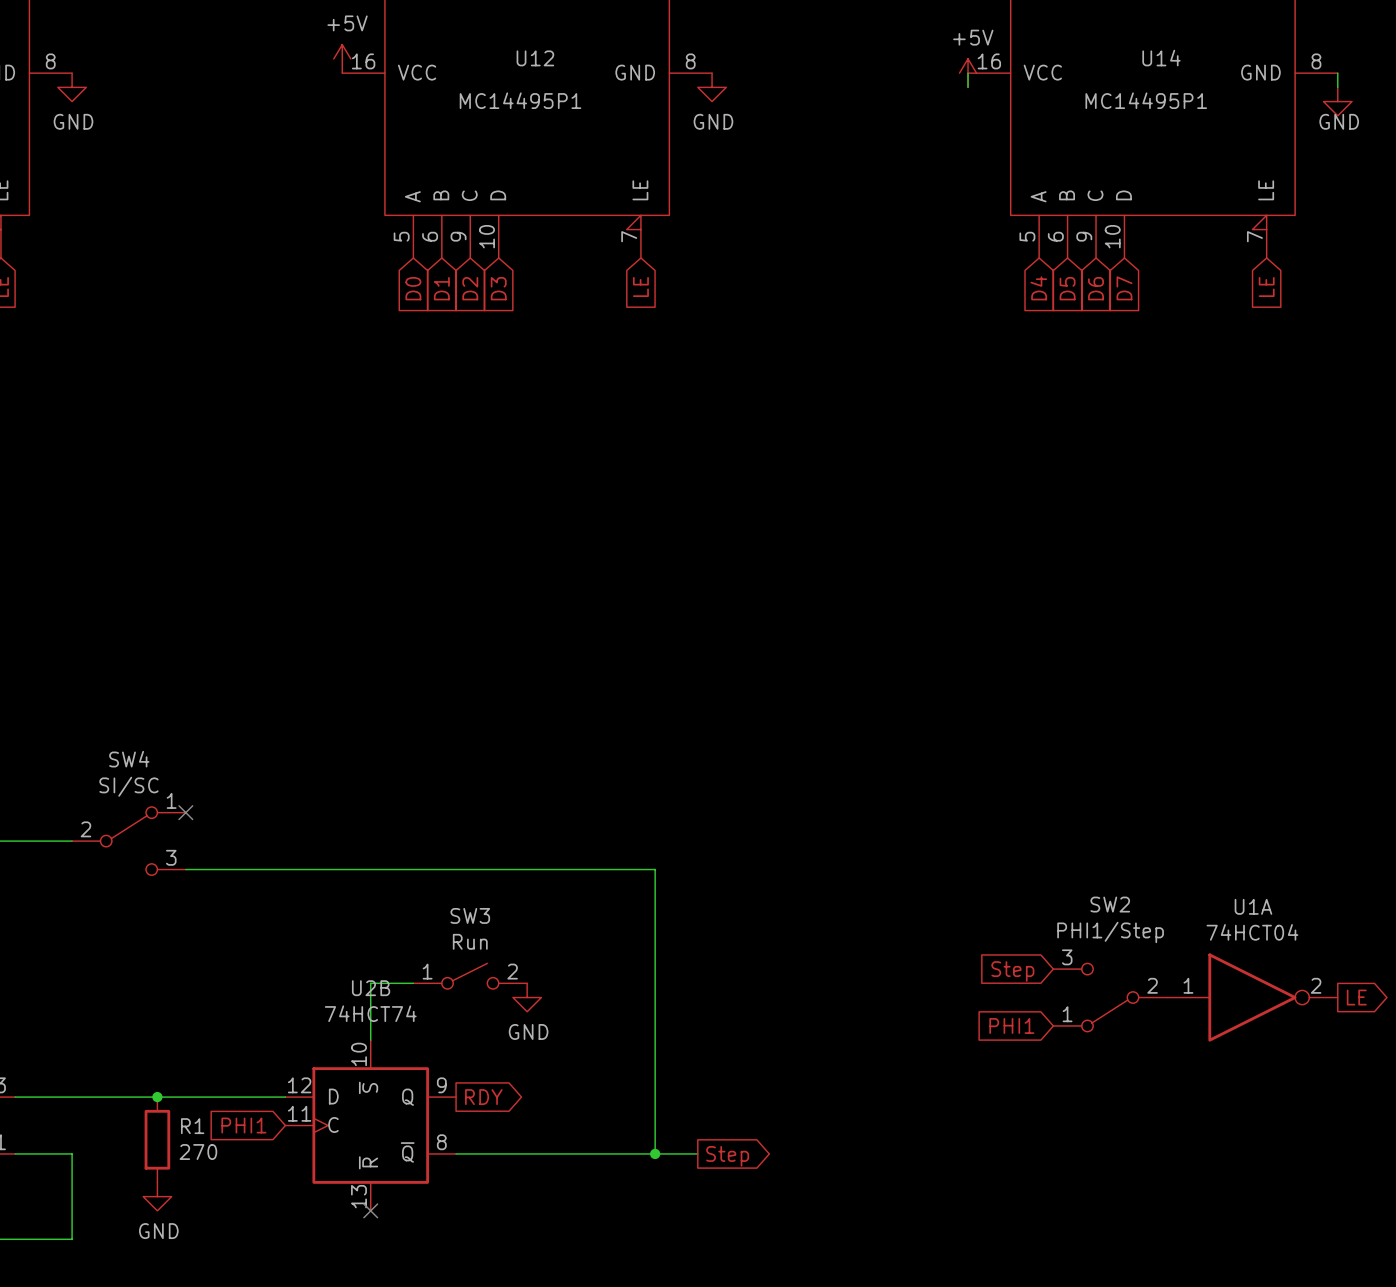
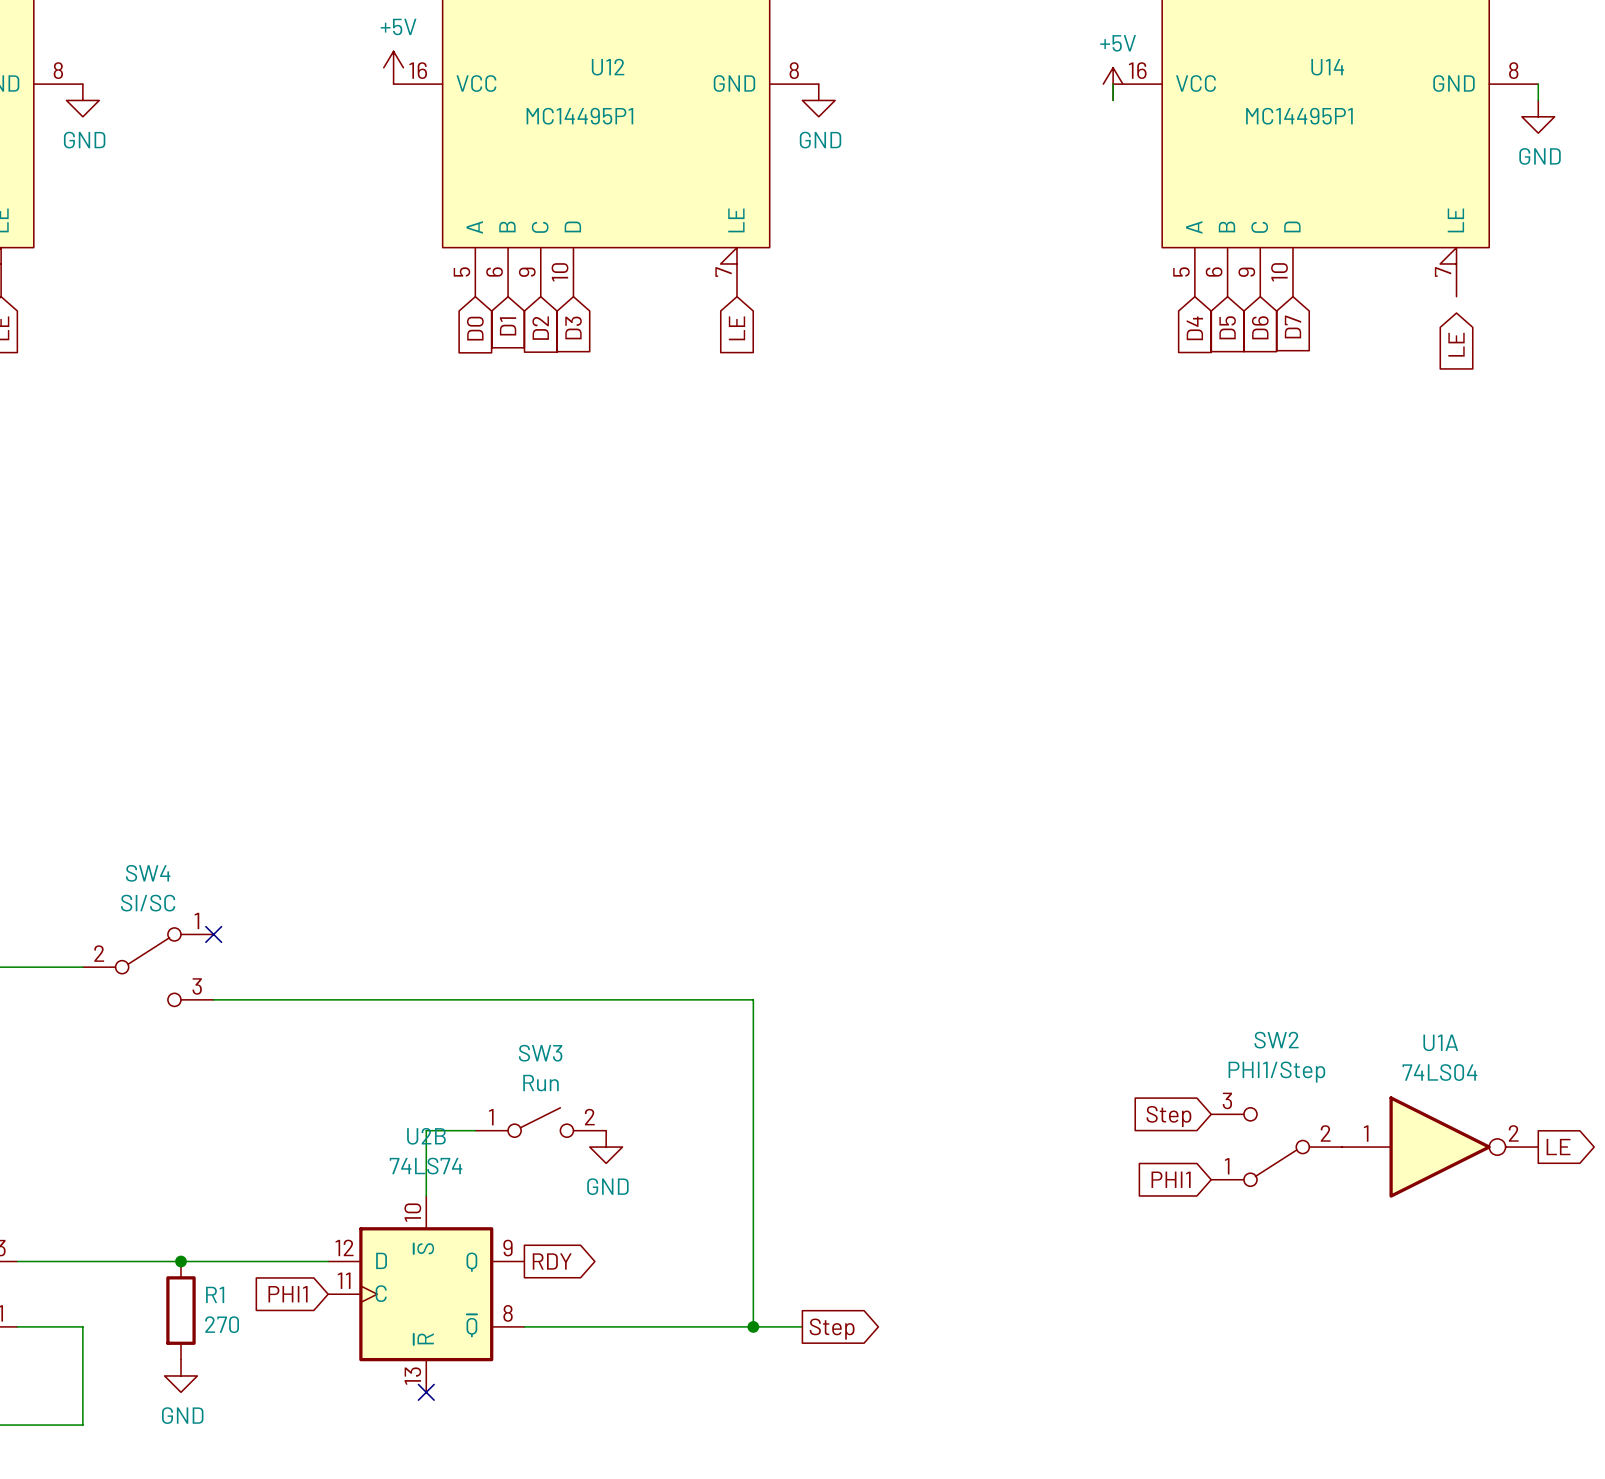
power symbol text position: GND (1339, 121) -> GND (1540, 156)
global label position: LE (1266, 286) -> LE (1456, 344)
U1A value: 74HCT04 (1252, 932) -> 74LS04 (1439, 1072)
U2B value: 74HCT74 (370, 1013) -> 74LS74 (425, 1166)

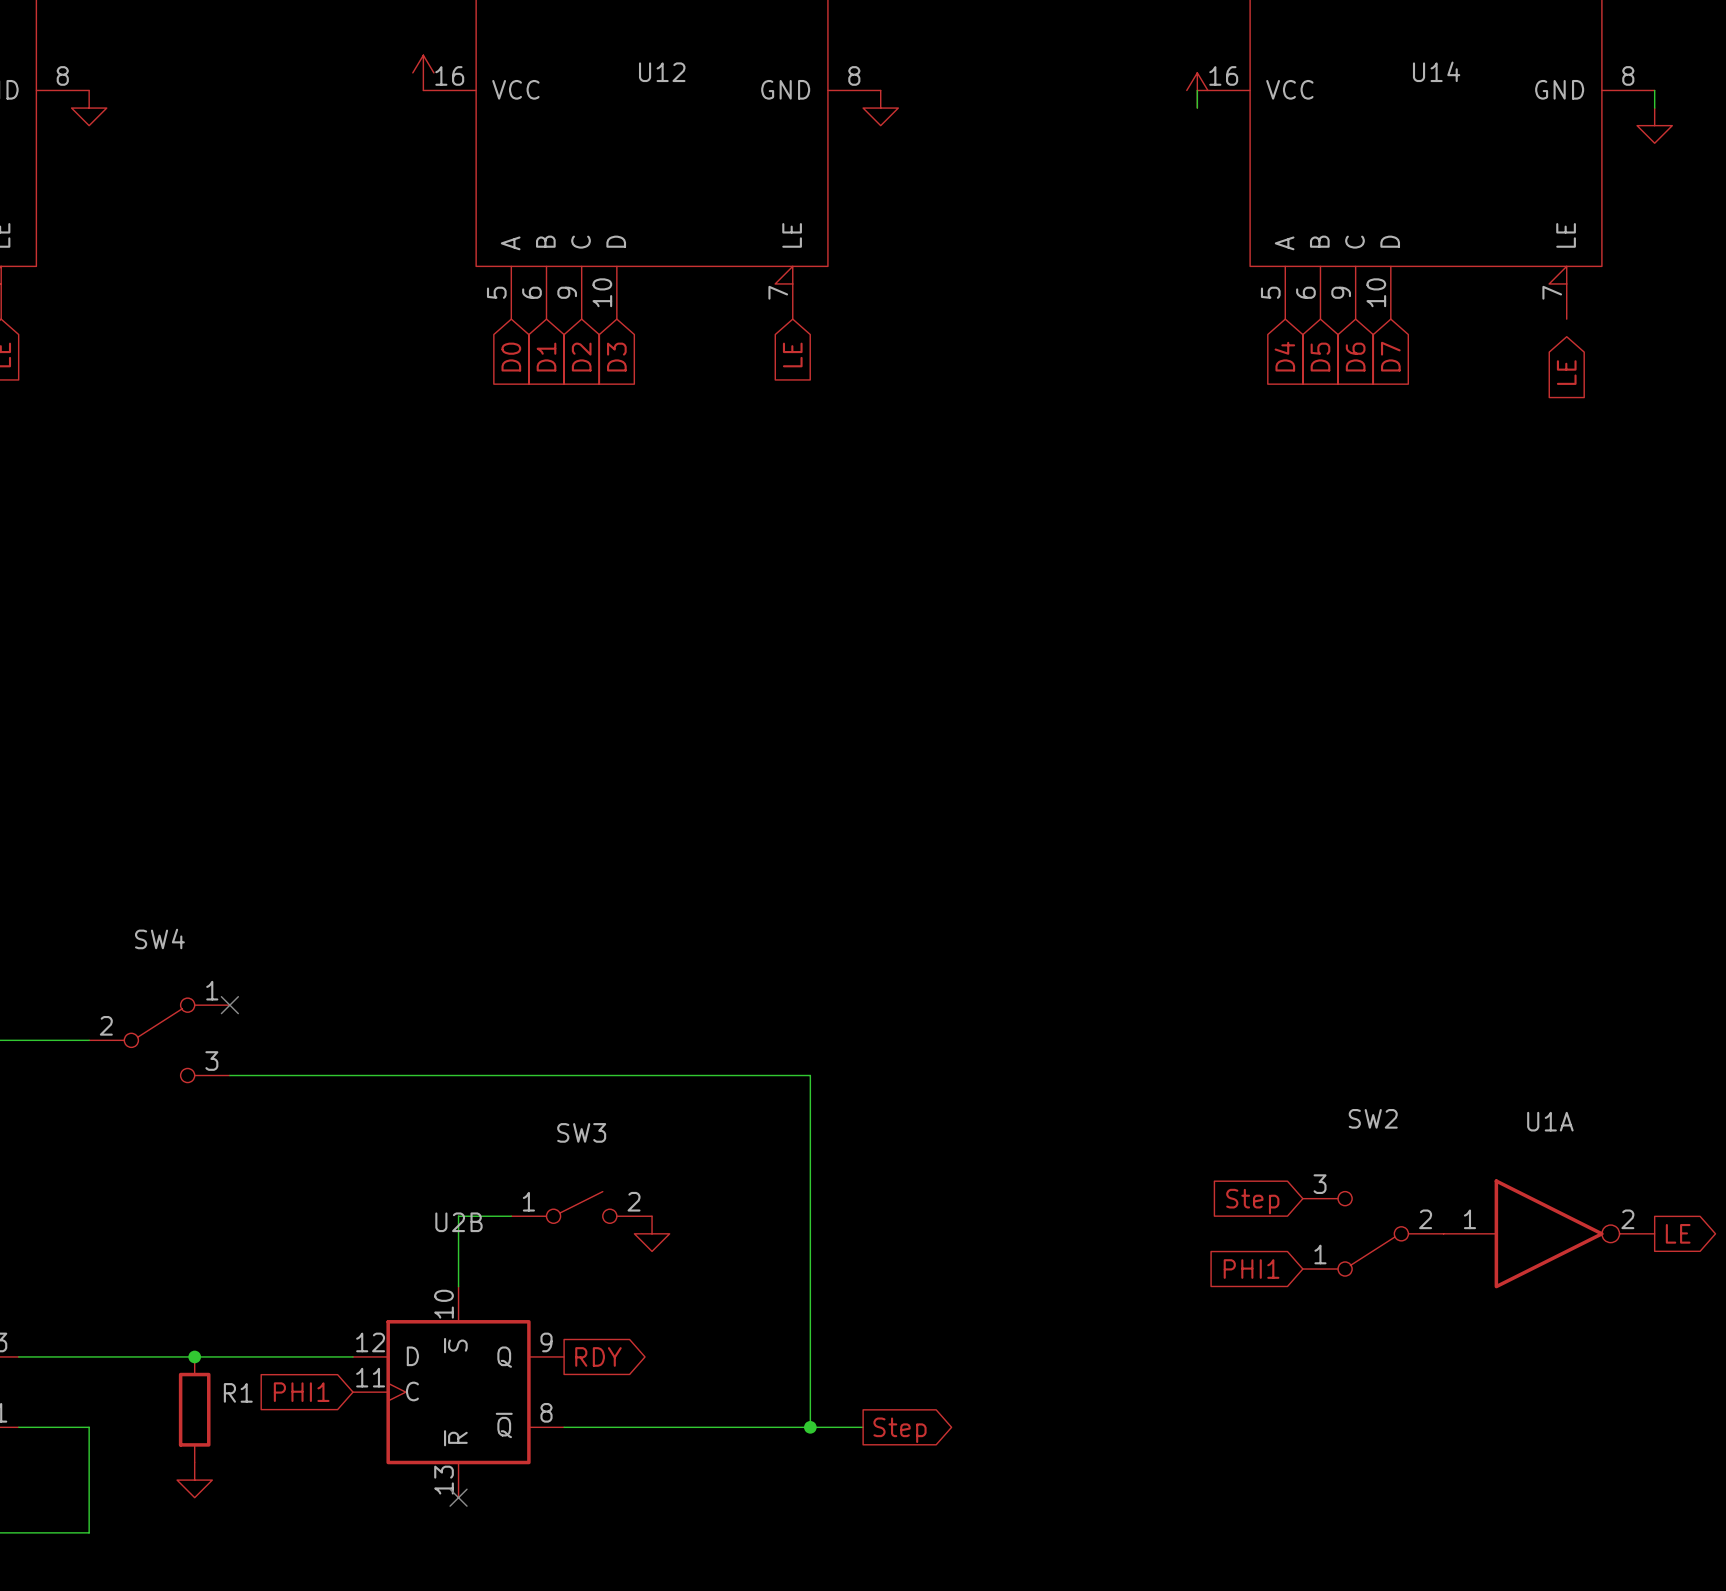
power symbol text: +5V (398, 26) -> none
power symbol text: +5V (1118, 43) -> none
U12 value: MC14495P1 (579, 116) -> none
U14 value: MC14495P1 (1299, 116) -> none
power symbol text: GND (84, 140) -> none
power symbol text: GND (820, 140) -> none
power symbol text: GND (1540, 156) -> none
SW4 value: SI/SC (148, 903) -> none
SW2 value: PHI1/Step (1276, 1072) -> none
U1A value: 74LS04 (1439, 1072) -> none
SW3 value: Run (540, 1083) -> none
U2B value: 74LS74 (425, 1166) -> none
power symbol text: GND (607, 1186) -> none
R1 value: 270 (222, 1324) -> none
power symbol text: GND (182, 1415) -> none

